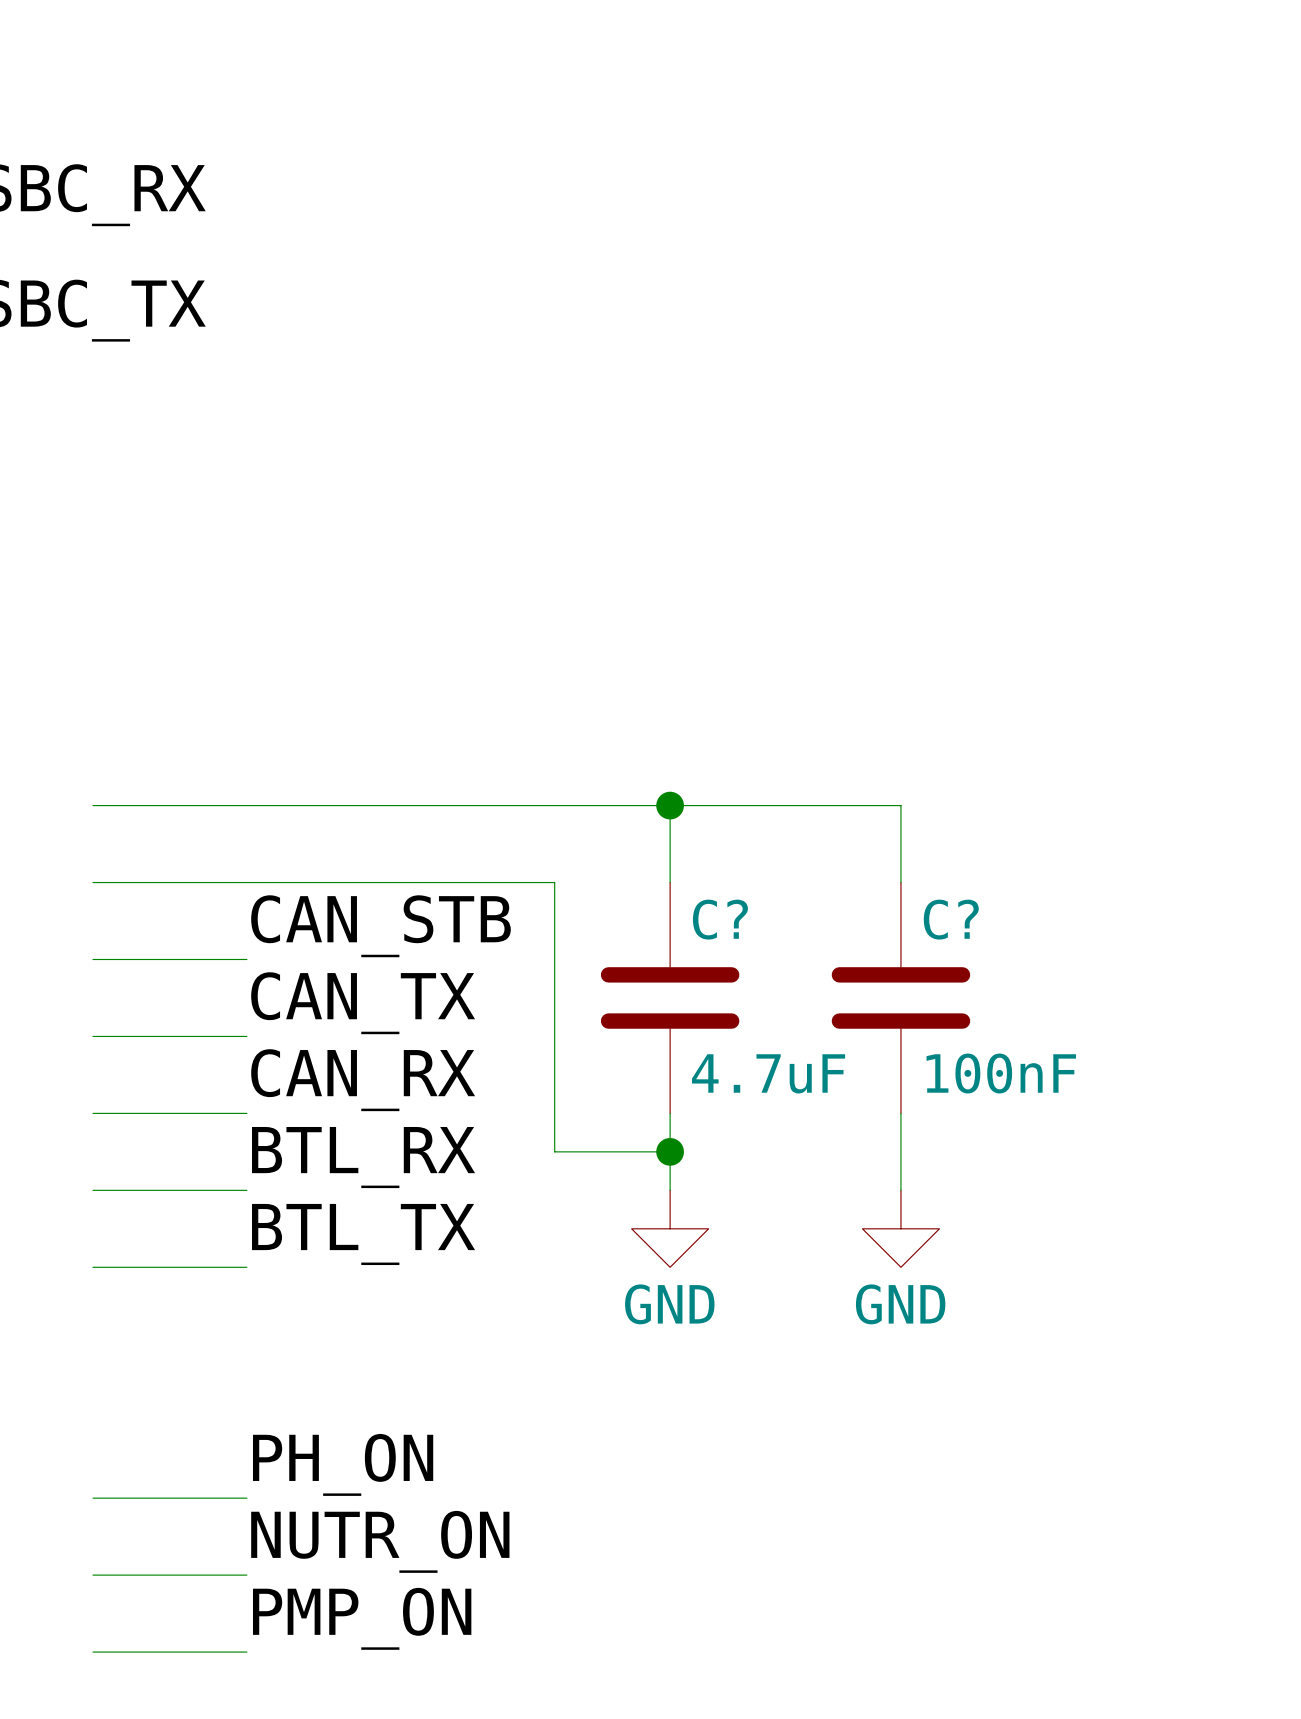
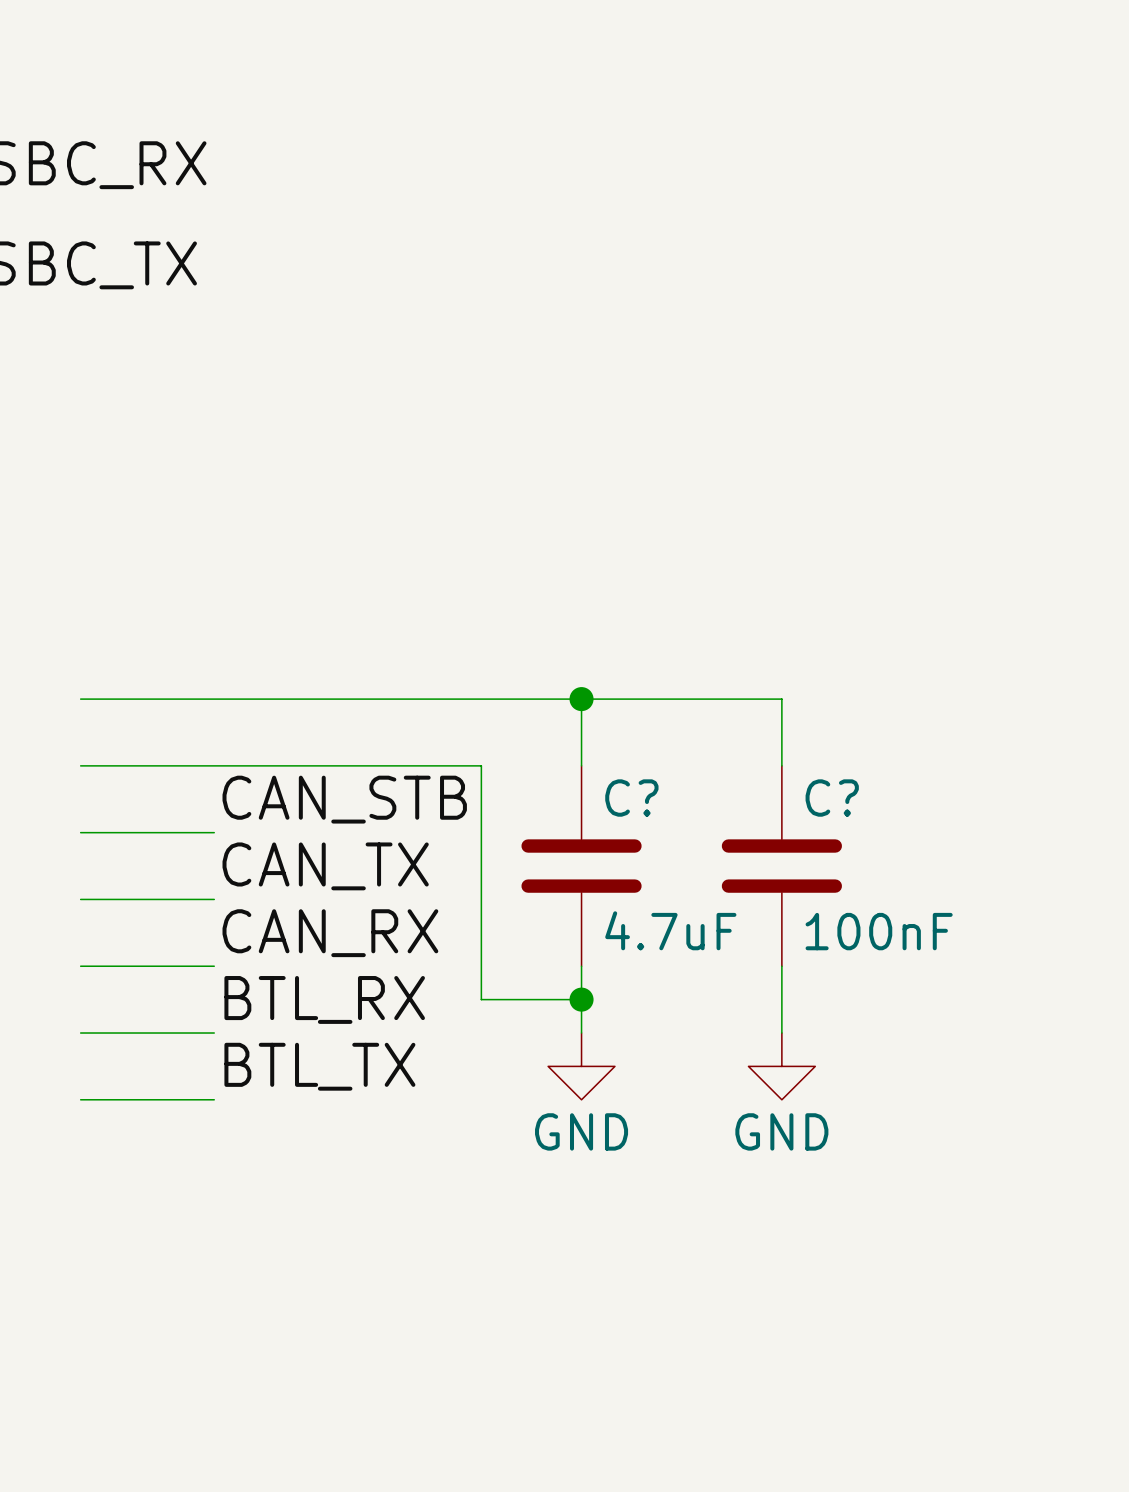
label: PH_ON (343, 1464) -> none
wire: (92, 1498) (246, 1498) -> none
label: NUTR_ON (380, 1541) -> none
wire: (92, 1575) (246, 1575) -> none
label: PMP_ON (362, 1618) -> none
wire: (92, 1652) (246, 1652) -> none

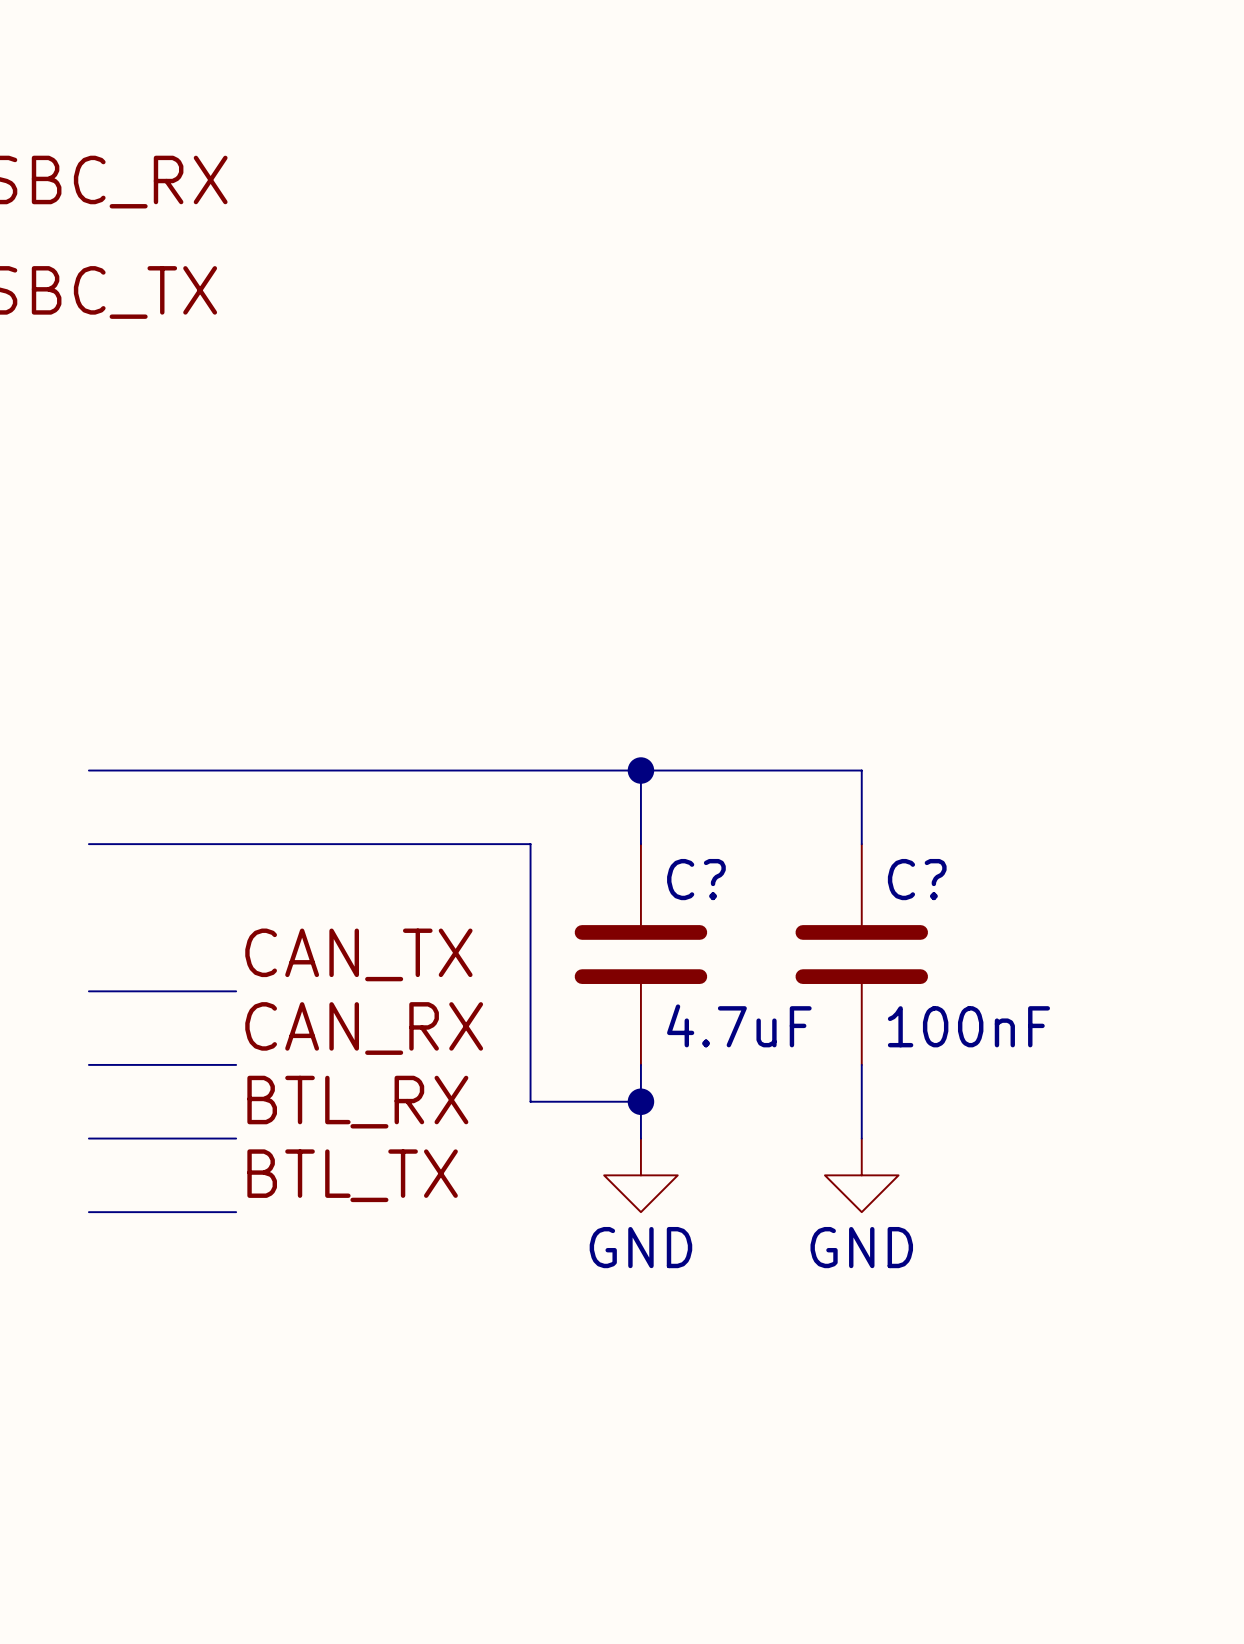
label: CAN_STB (344, 799) -> none
wire: (80, 832) (214, 832) -> none

